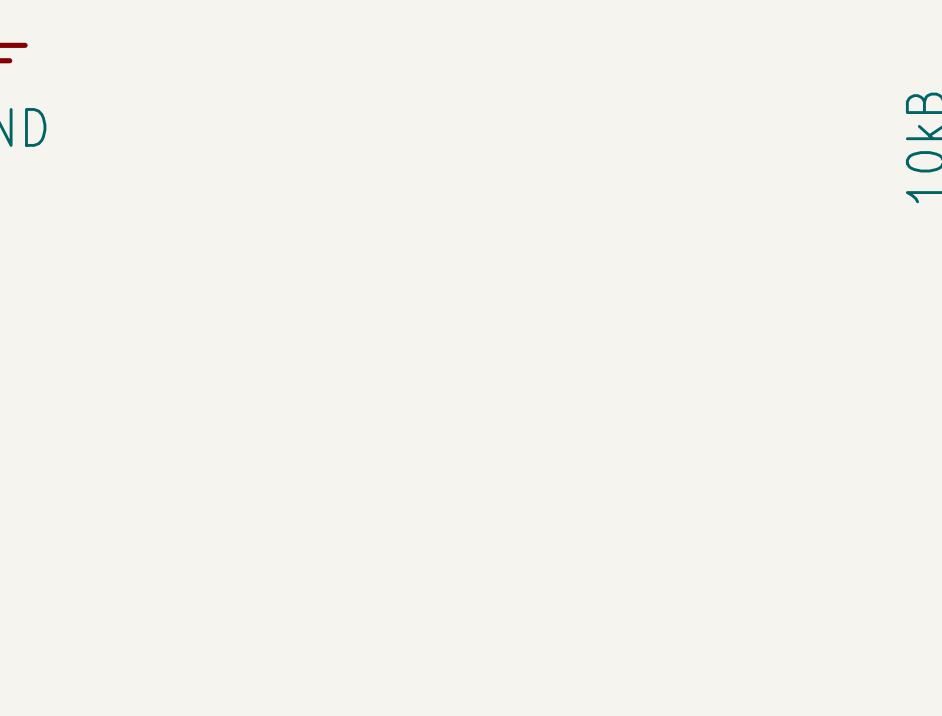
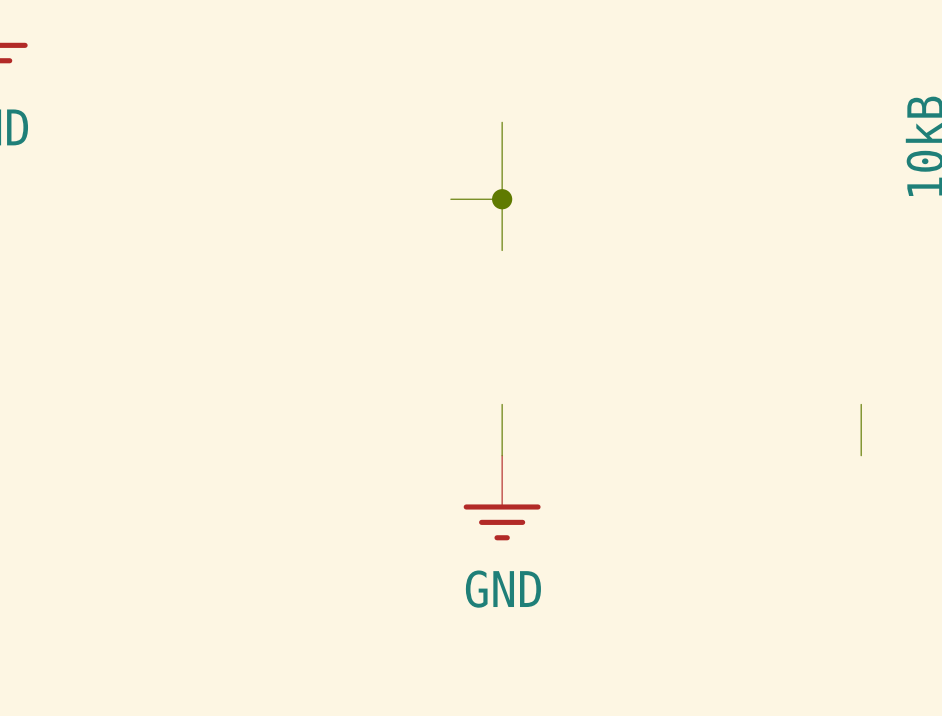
wire: none -> (502, 122) (502, 250)
wire: none -> (450, 199) (502, 199)
junction: none -> (502, 199)
wire: none -> (502, 404) (502, 455)
wire: none -> (861, 404) (861, 455)
power symbol: none -> GND (502, 498)

